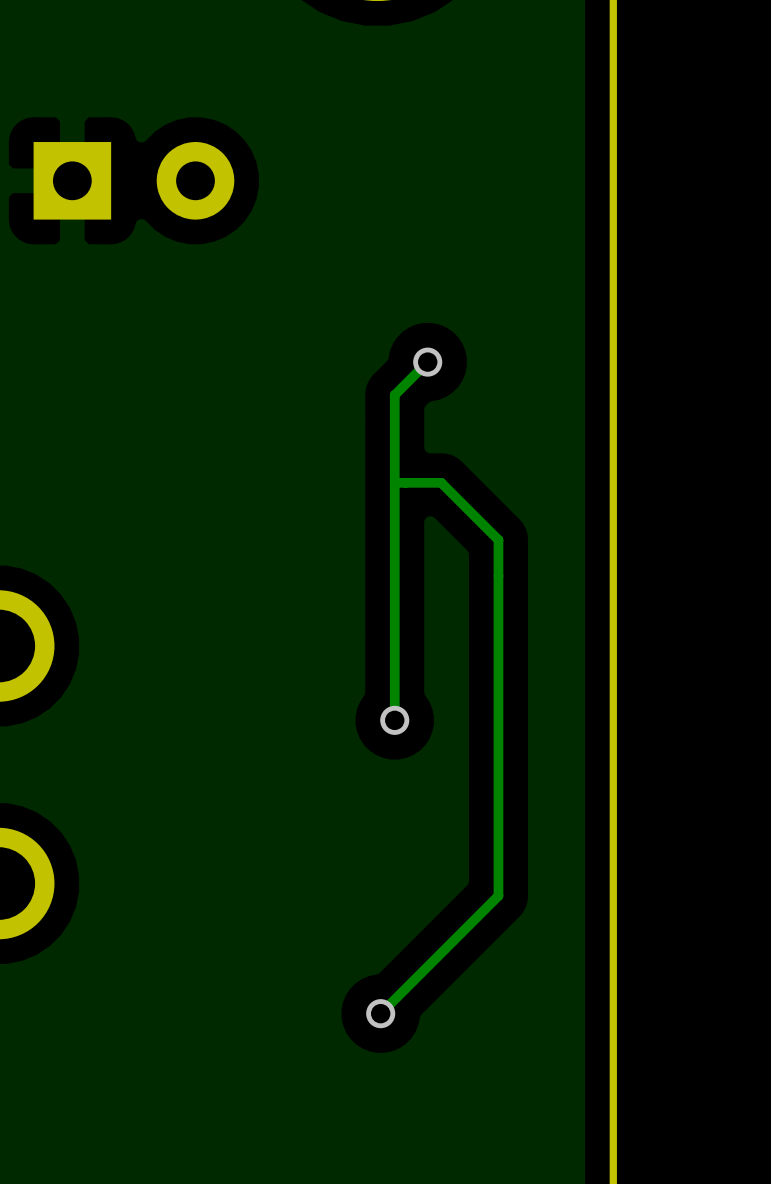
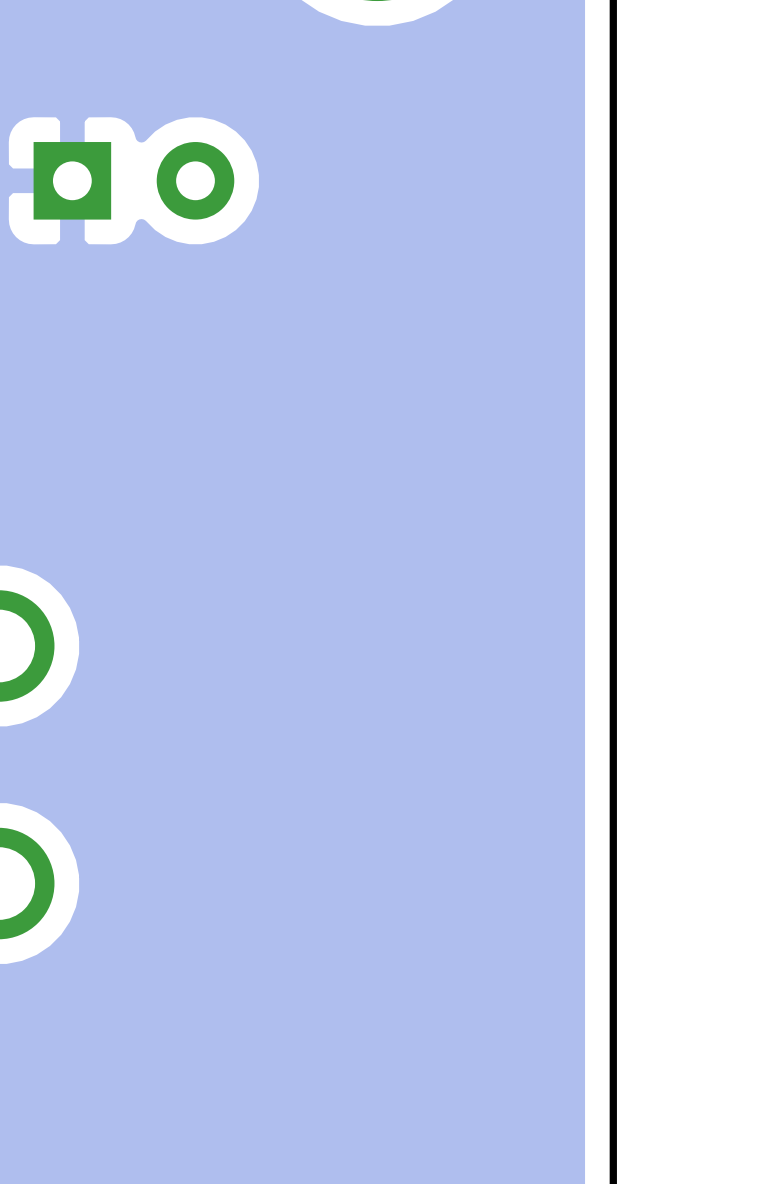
track: (427, 362) (394, 395) (394, 720) -> none
via: (427, 362) -> none
track: (394, 482) (441, 482) (498, 540) (498, 895) (380, 1013) -> none
via: (394, 720) -> none
via: (380, 1013) -> none

